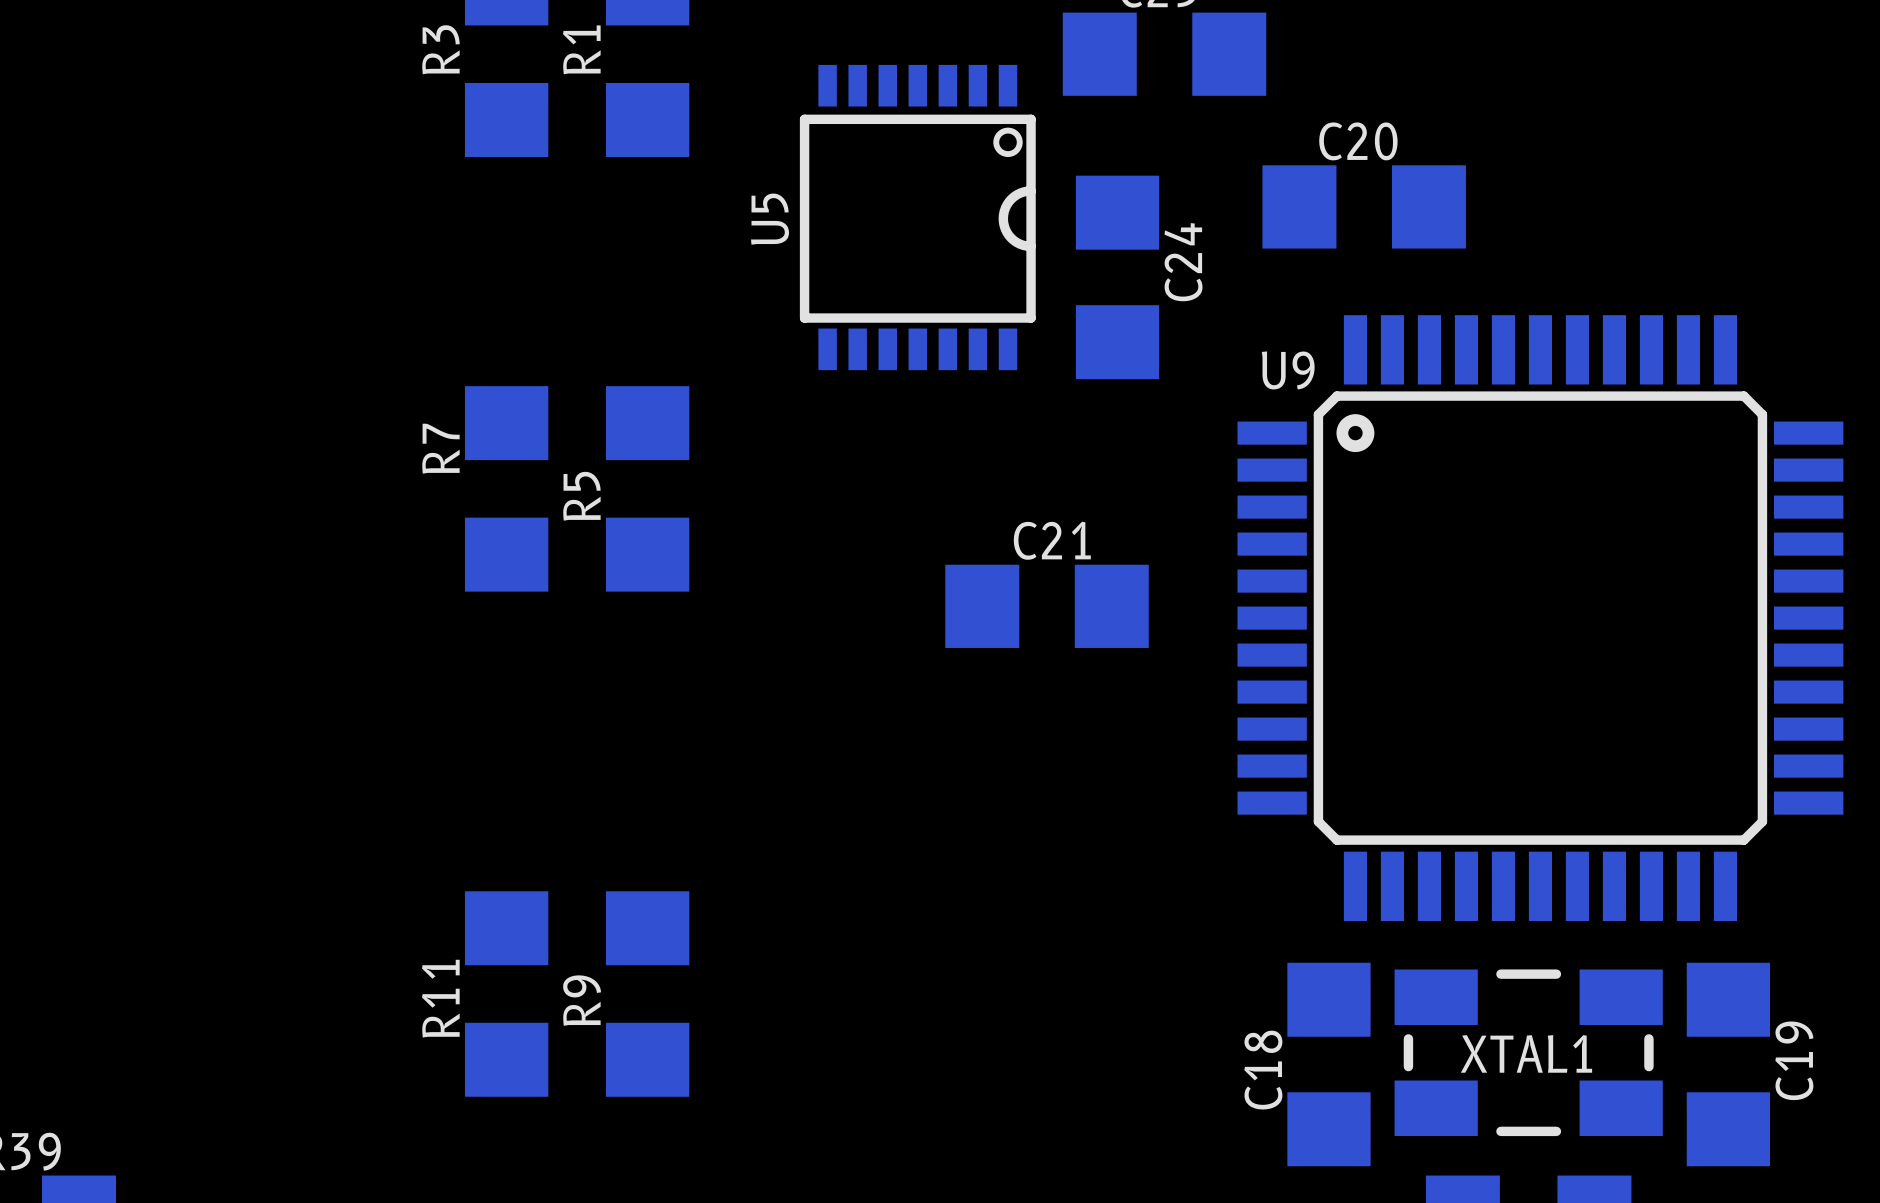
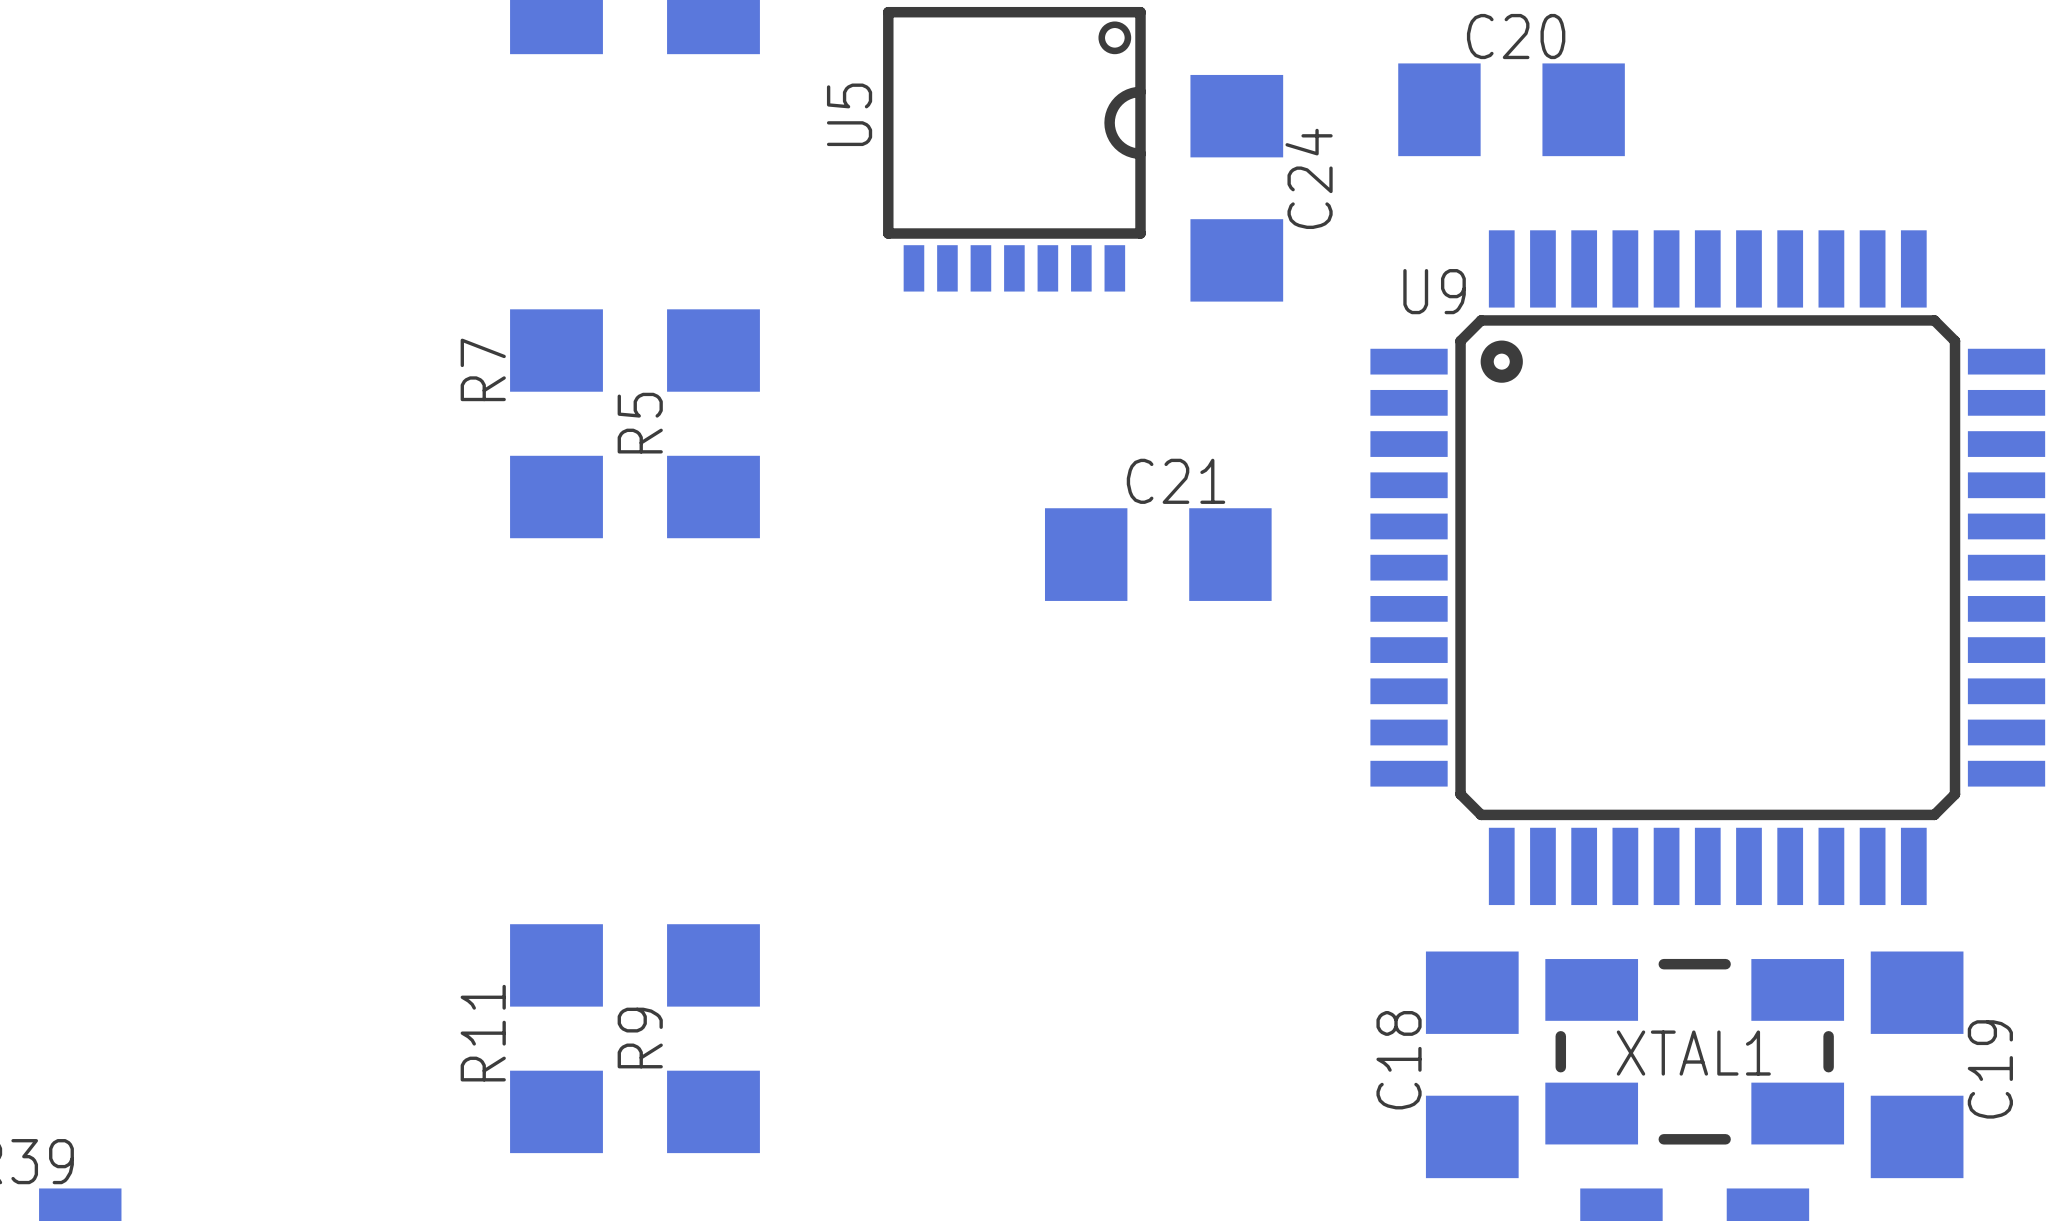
R11 position: (506, 994) -> (556, 1038)
R9 position: (647, 994) -> (713, 1038)

